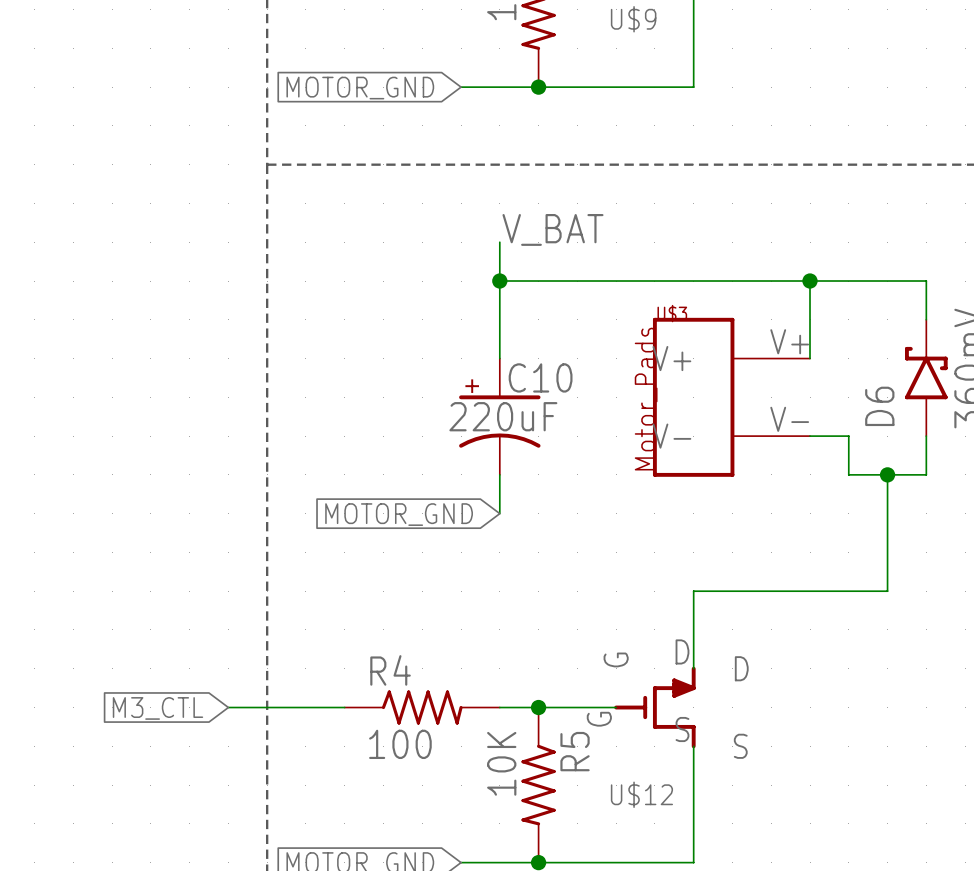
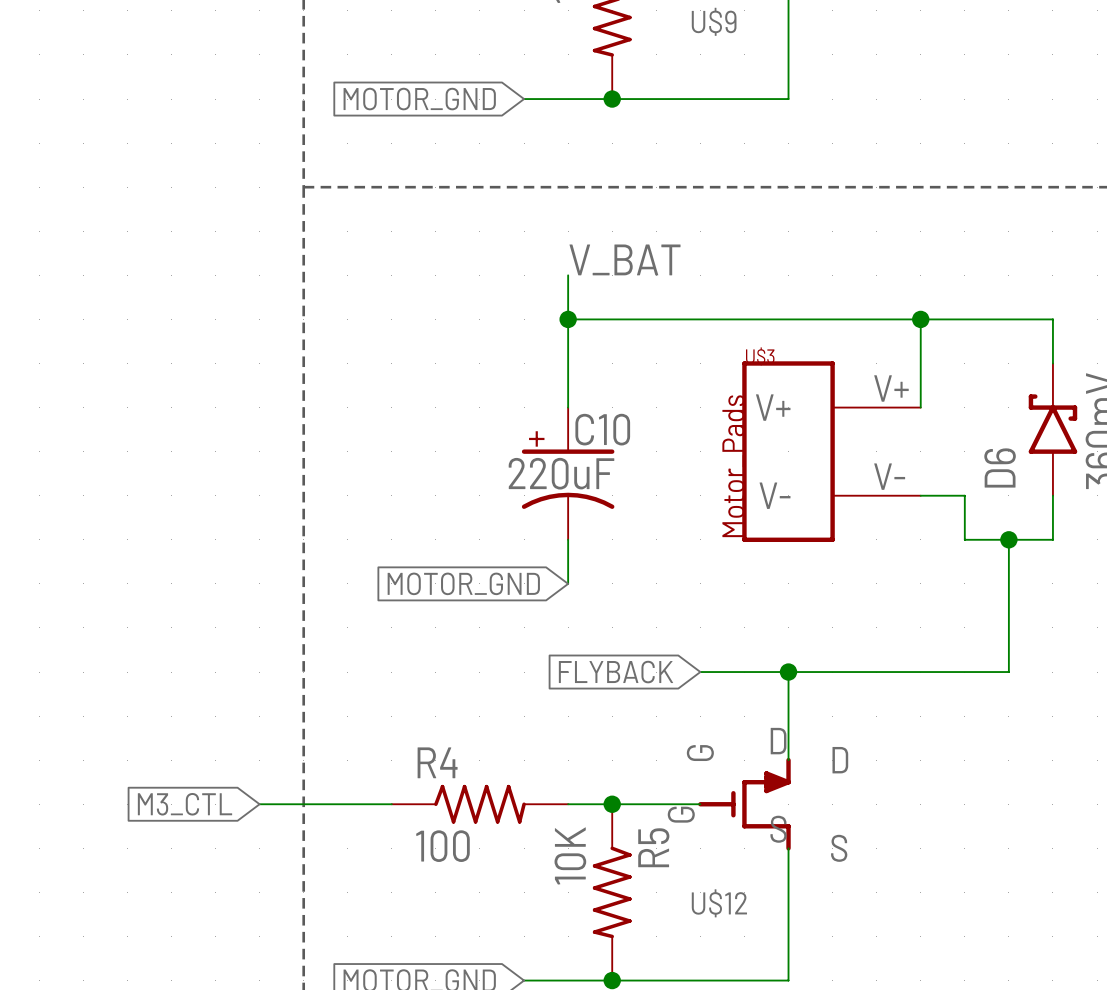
global label: none -> FLYBACK (616, 672)
wire: none -> (700, 672) (788, 672)
junction: none -> (788, 672)

